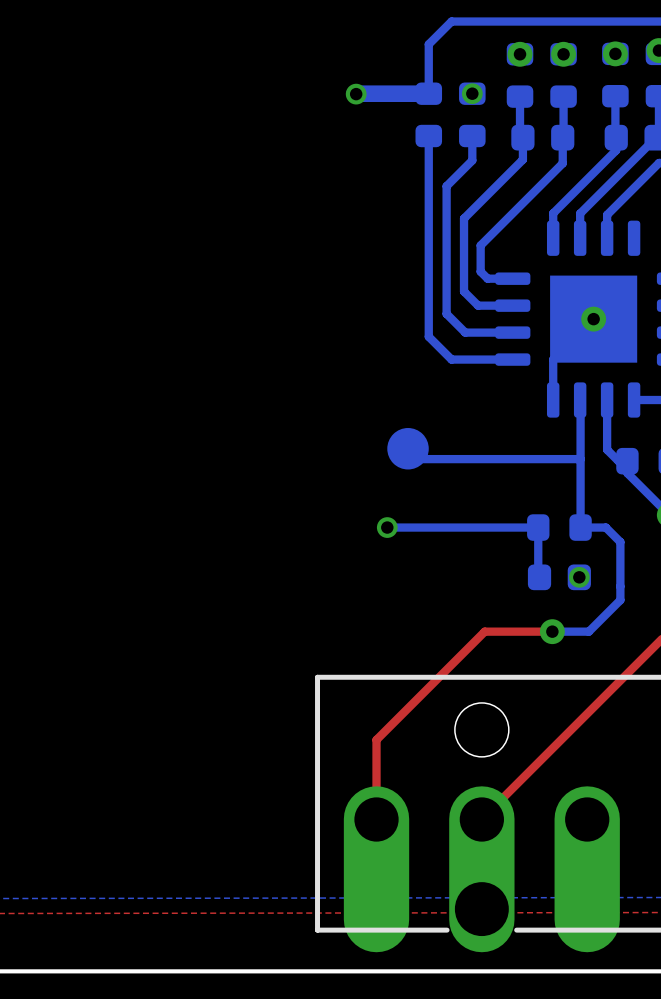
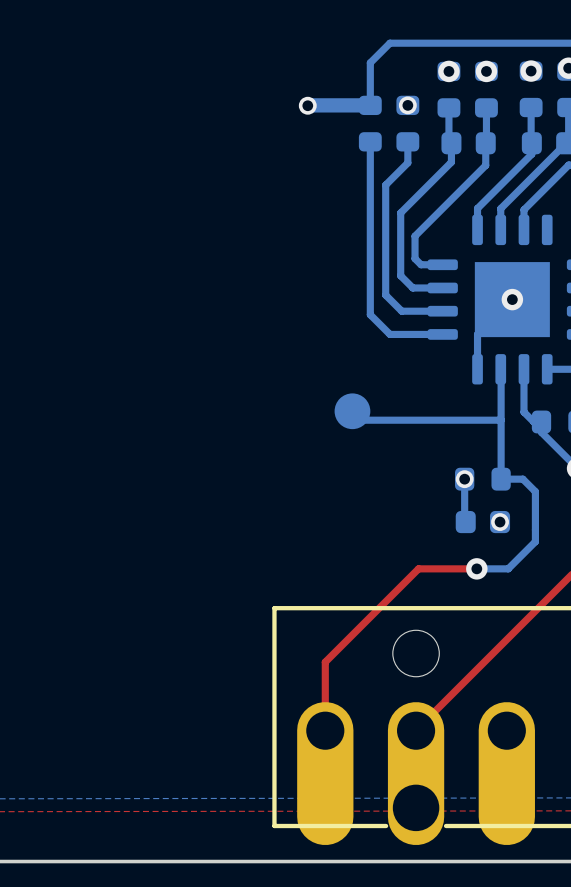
bottom track: (387, 527) (538, 527) -> none
via position: (387, 527) -> (464, 479)

